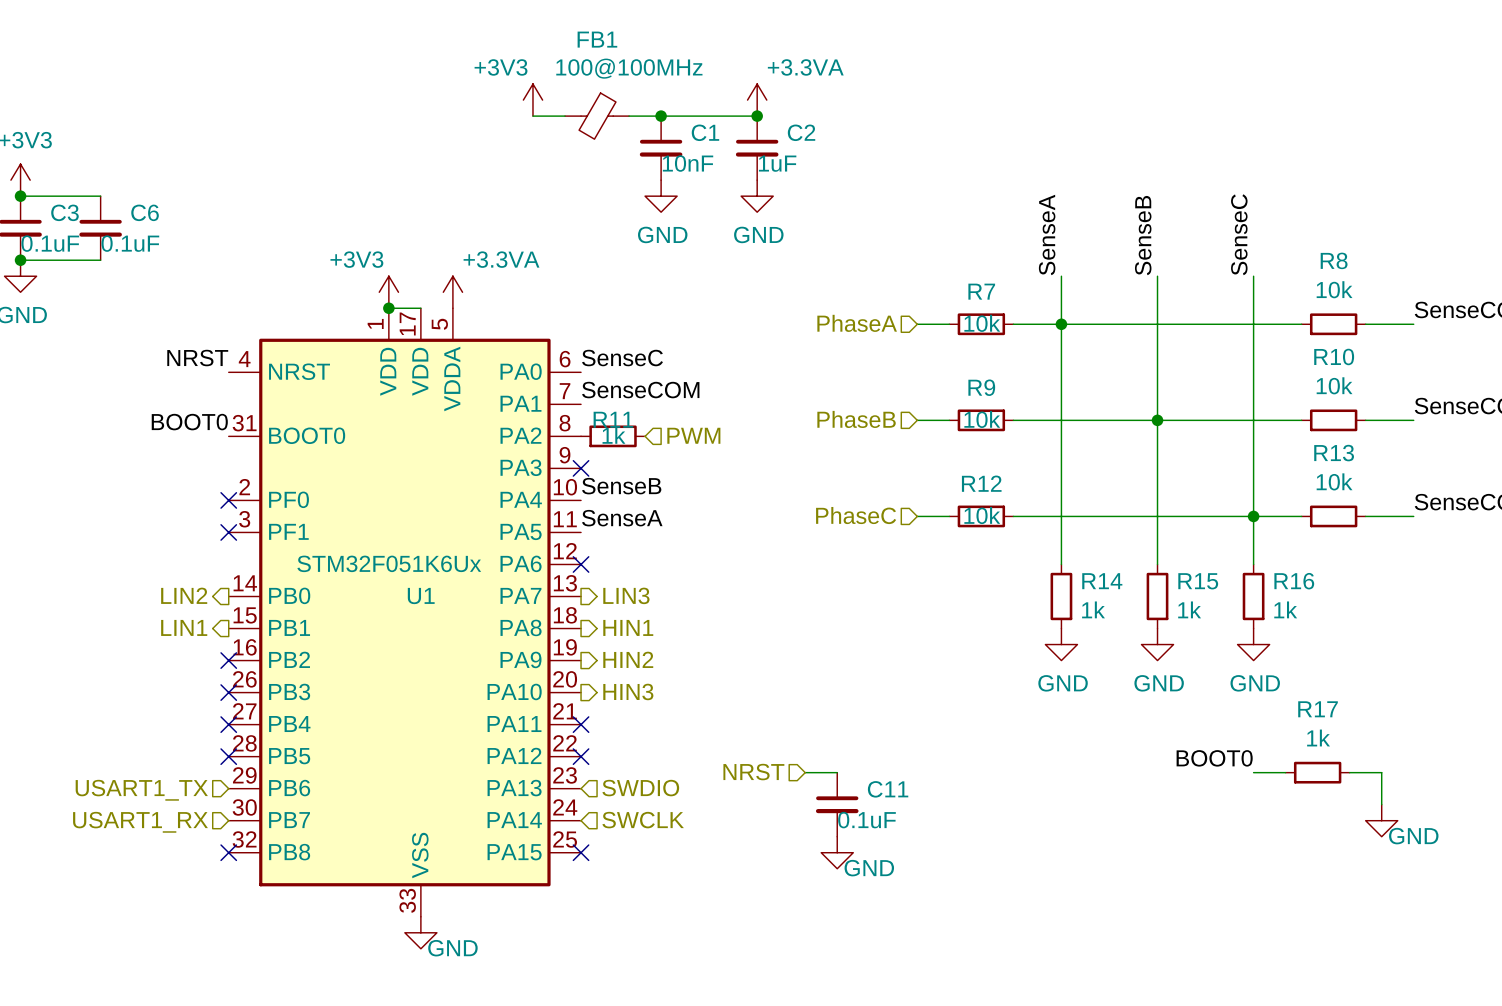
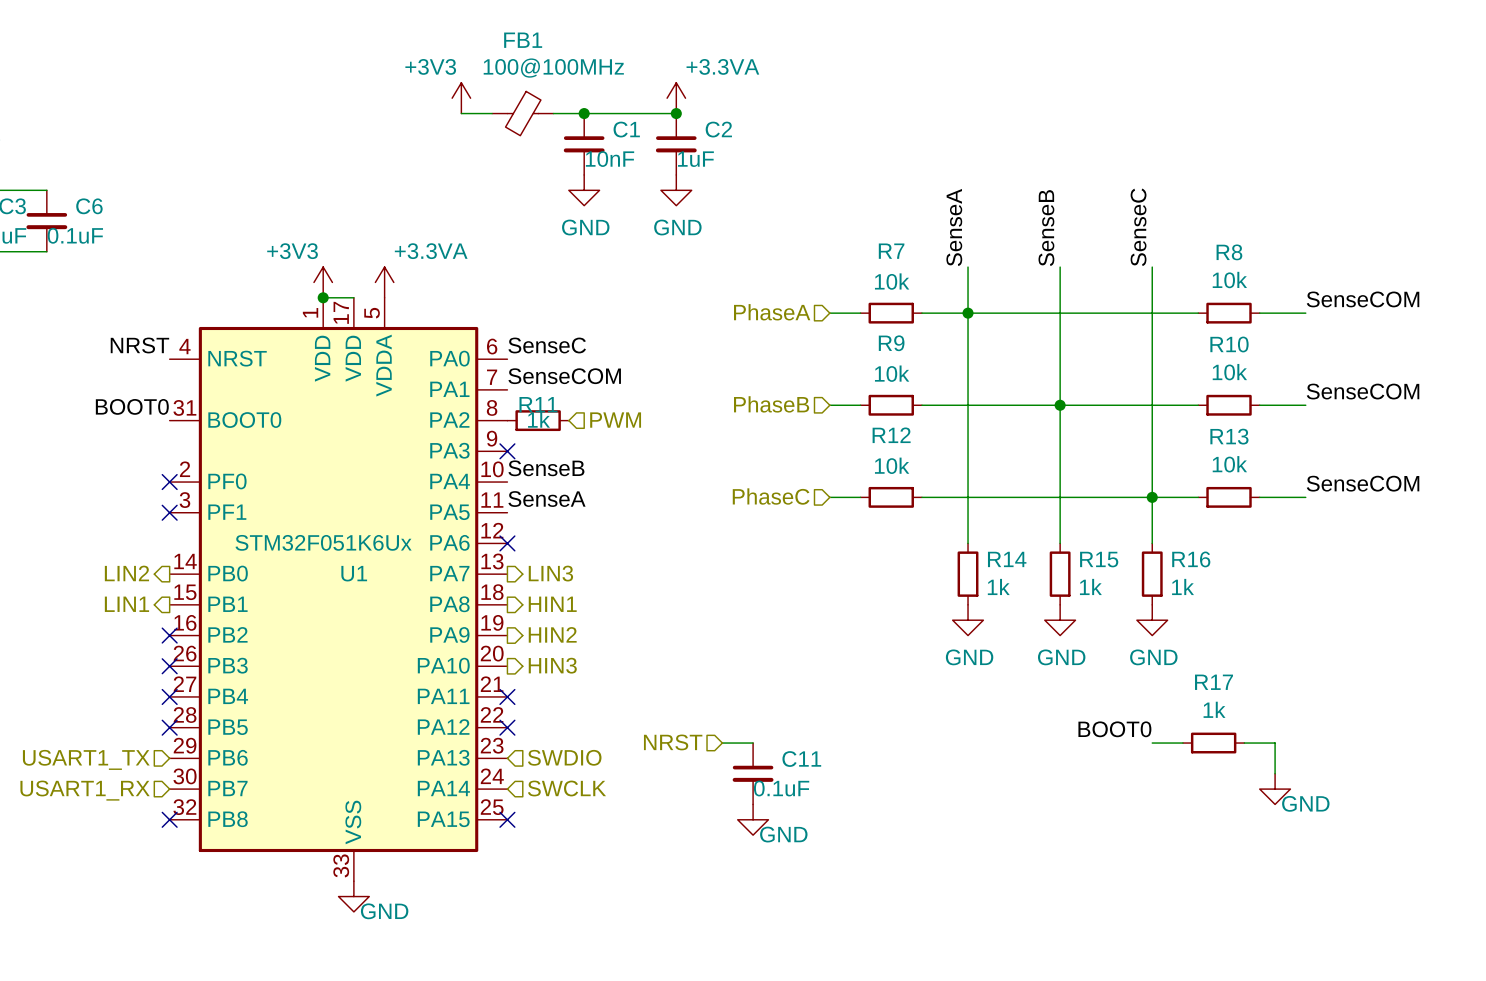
R7 name position: R7 (981, 291) -> R7 (891, 251)
R7 value position: 10k (982, 323) -> 10k (892, 281)
R9 name position: R9 (981, 387) -> R9 (891, 343)
R9 value position: 10k (982, 419) -> 10k (892, 373)
R12 name position: R12 (981, 483) -> R12 (891, 435)
R12 value position: 10k (982, 515) -> 10k (892, 465)

